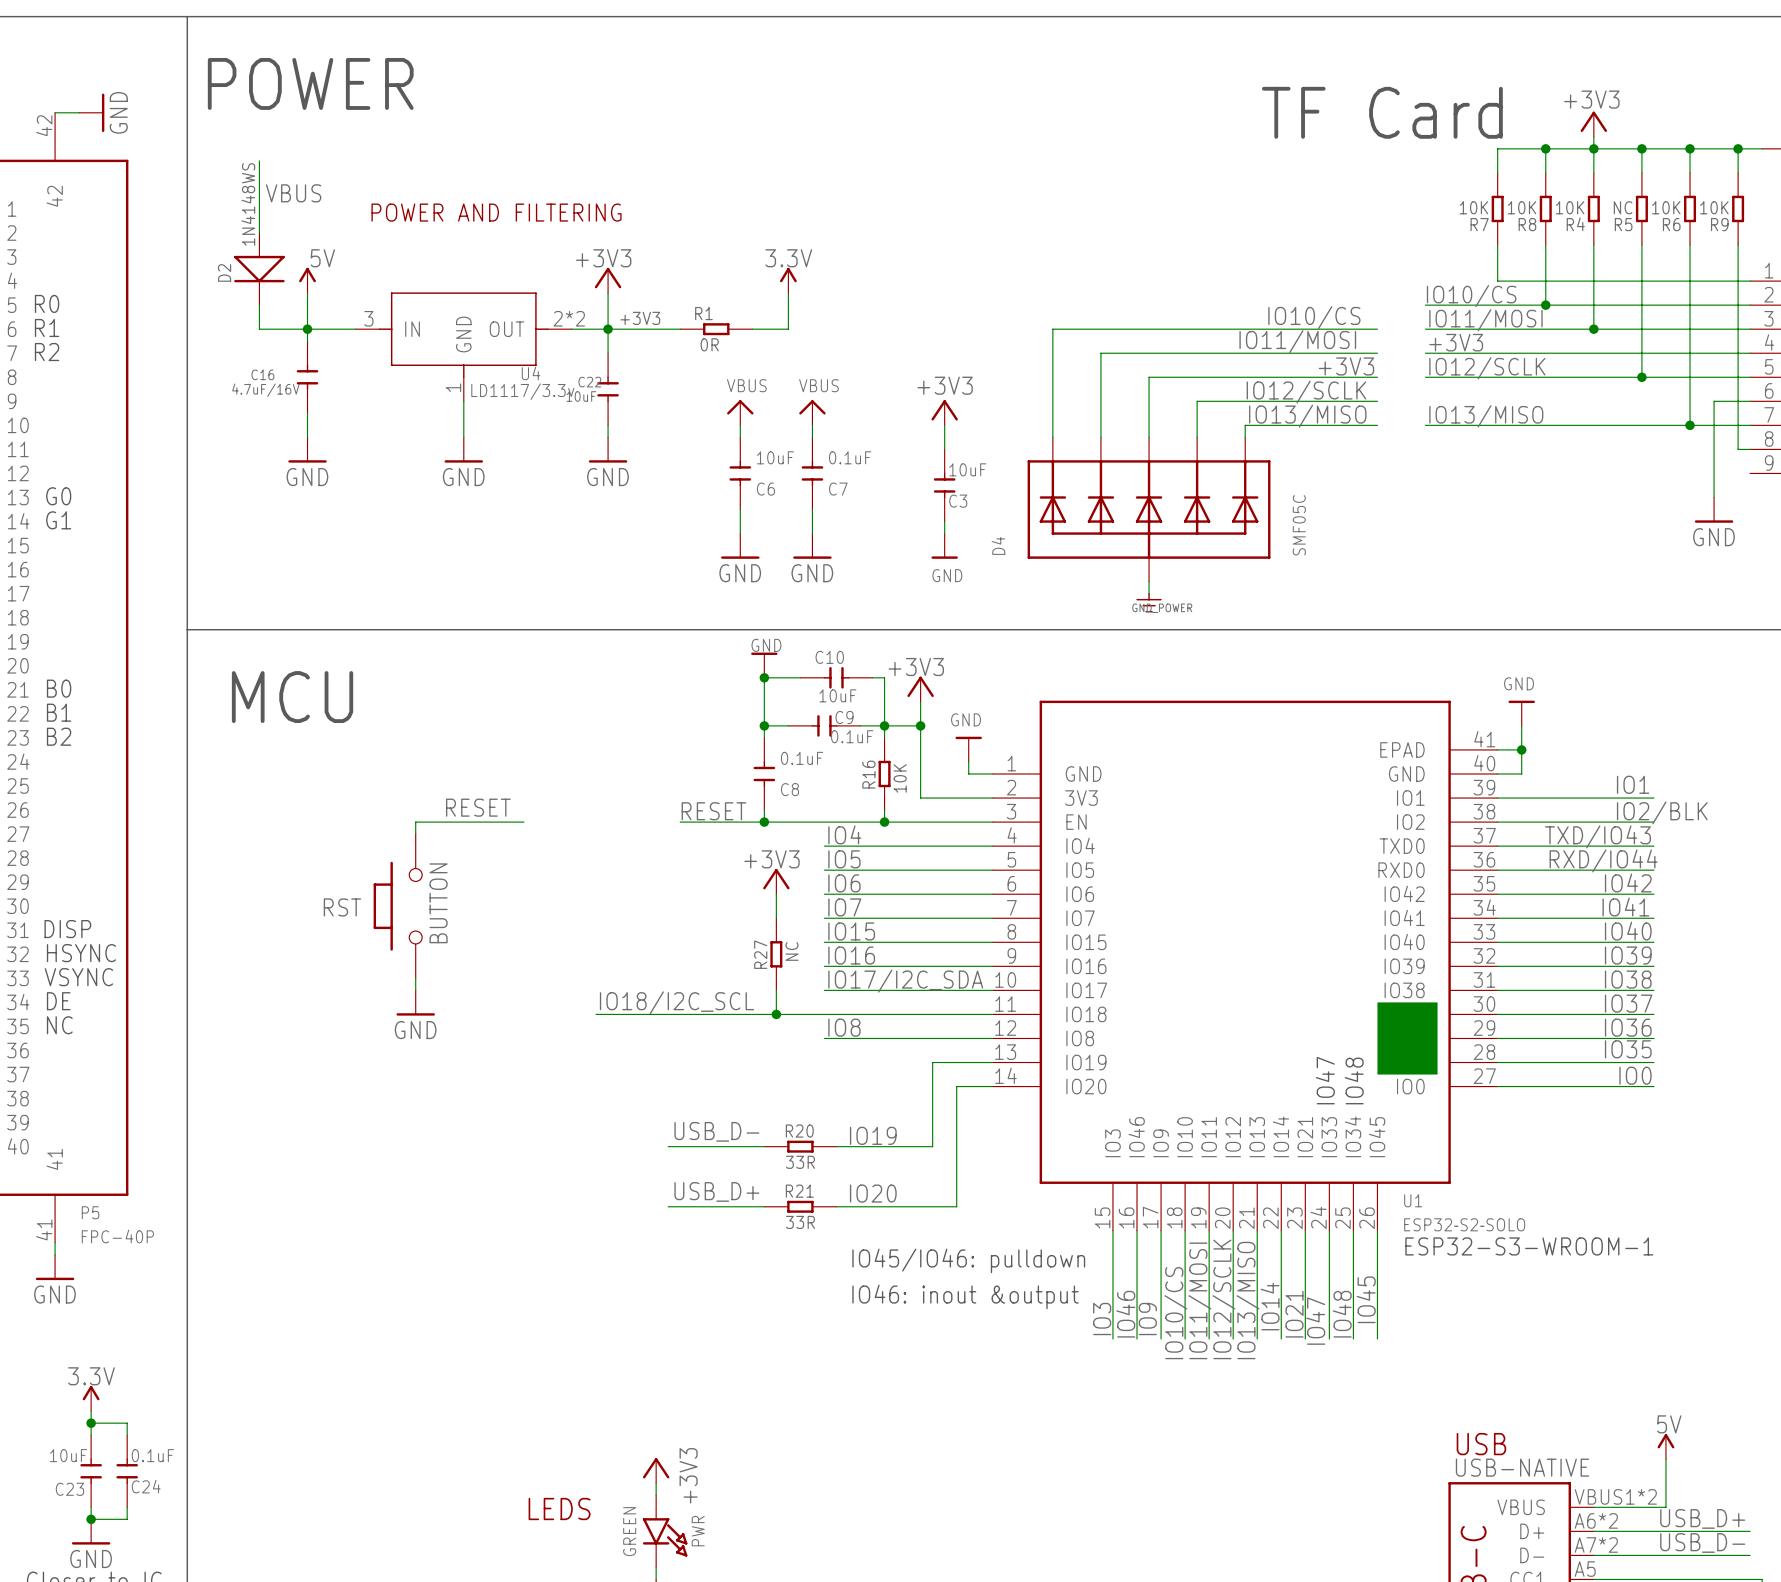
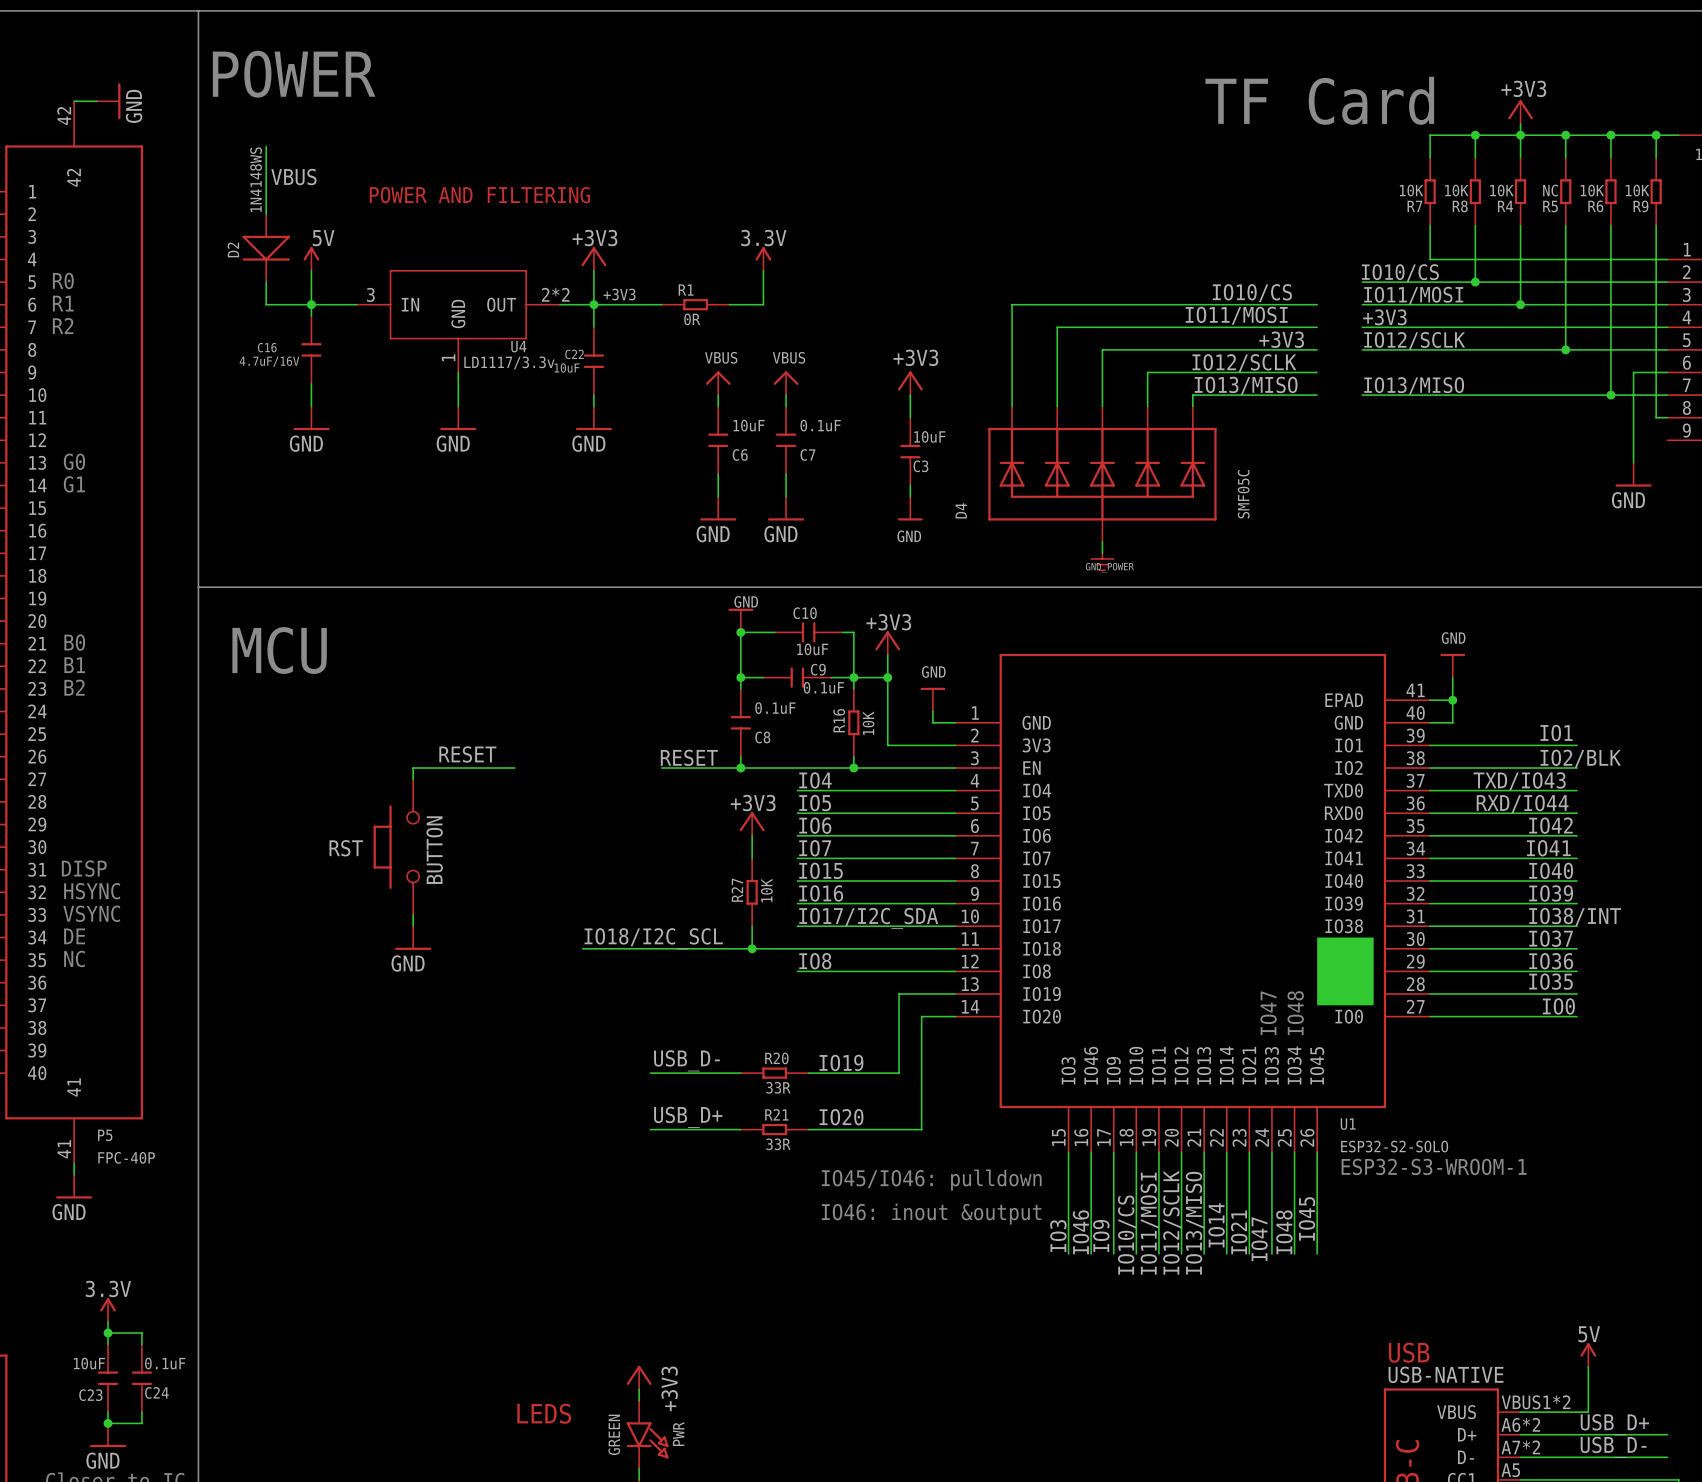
R27 value: NC (791, 951) -> 10K (766, 890)
label: IO38 (1628, 979) -> IO38/INT (1575, 916)

